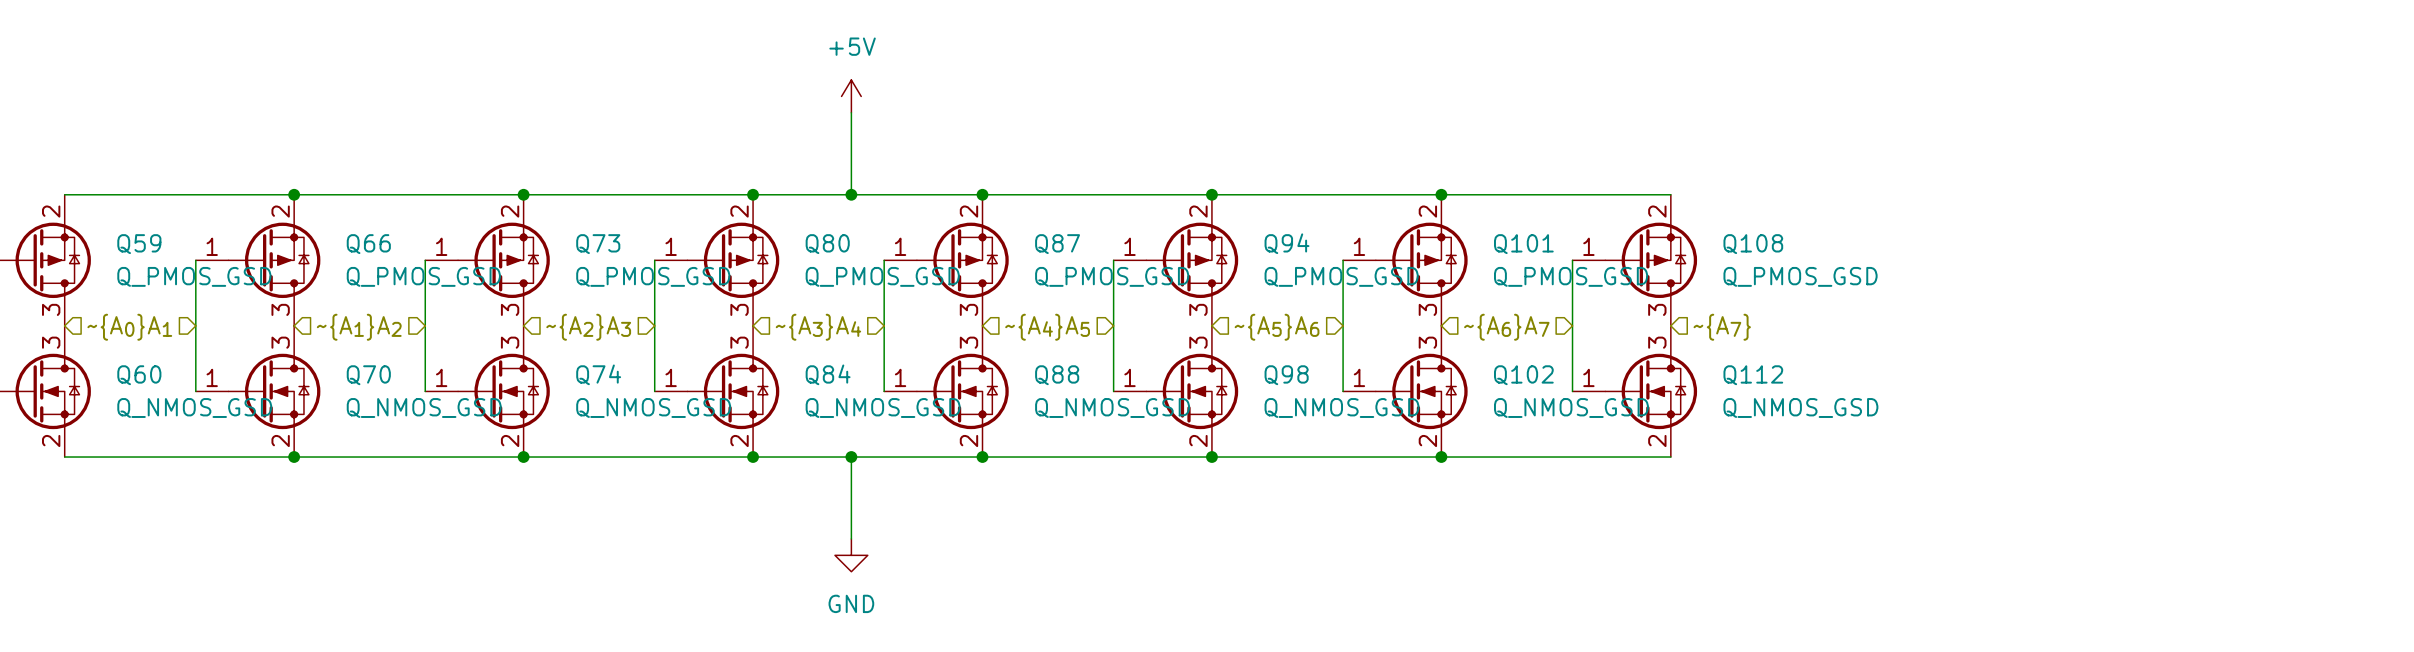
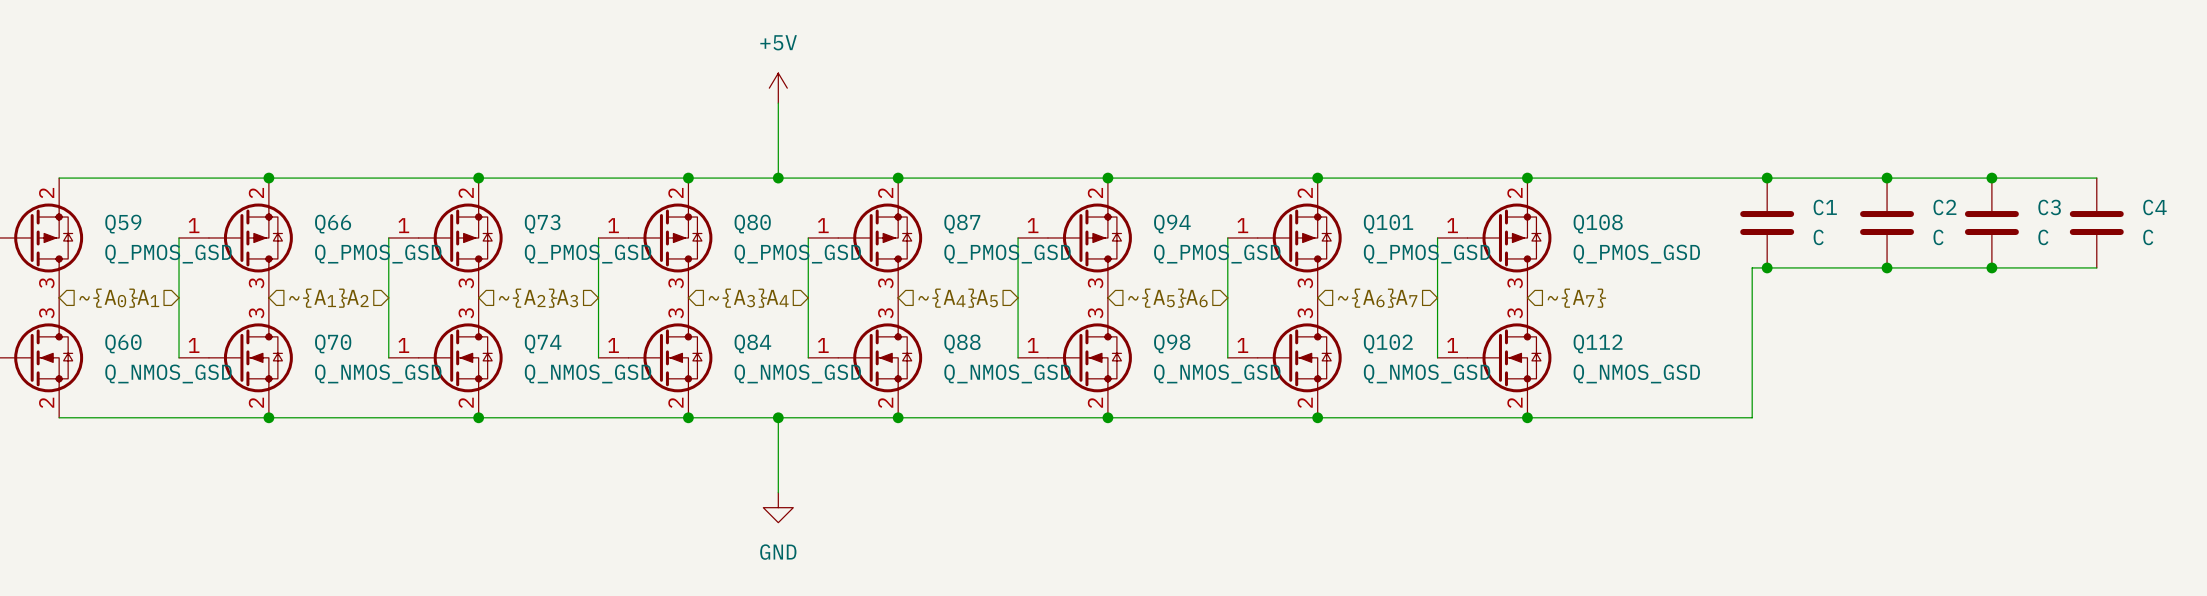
wire: none -> (1527, 178) (2096, 178)
junction: none -> (1527, 178)
junction: none -> (1767, 178)
junction: none -> (1887, 178)
junction: none -> (1991, 178)
C1: none -> C (1767, 223)
C2: none -> C (1887, 223)
C3: none -> C (1991, 223)
C4: none -> C (2096, 223)
junction: none -> (1767, 267)
junction: none -> (1887, 267)
junction: none -> (1991, 267)
wire: none -> (2096, 267) (1752, 267) (1752, 417) (1527, 417)
junction: none -> (1527, 417)

